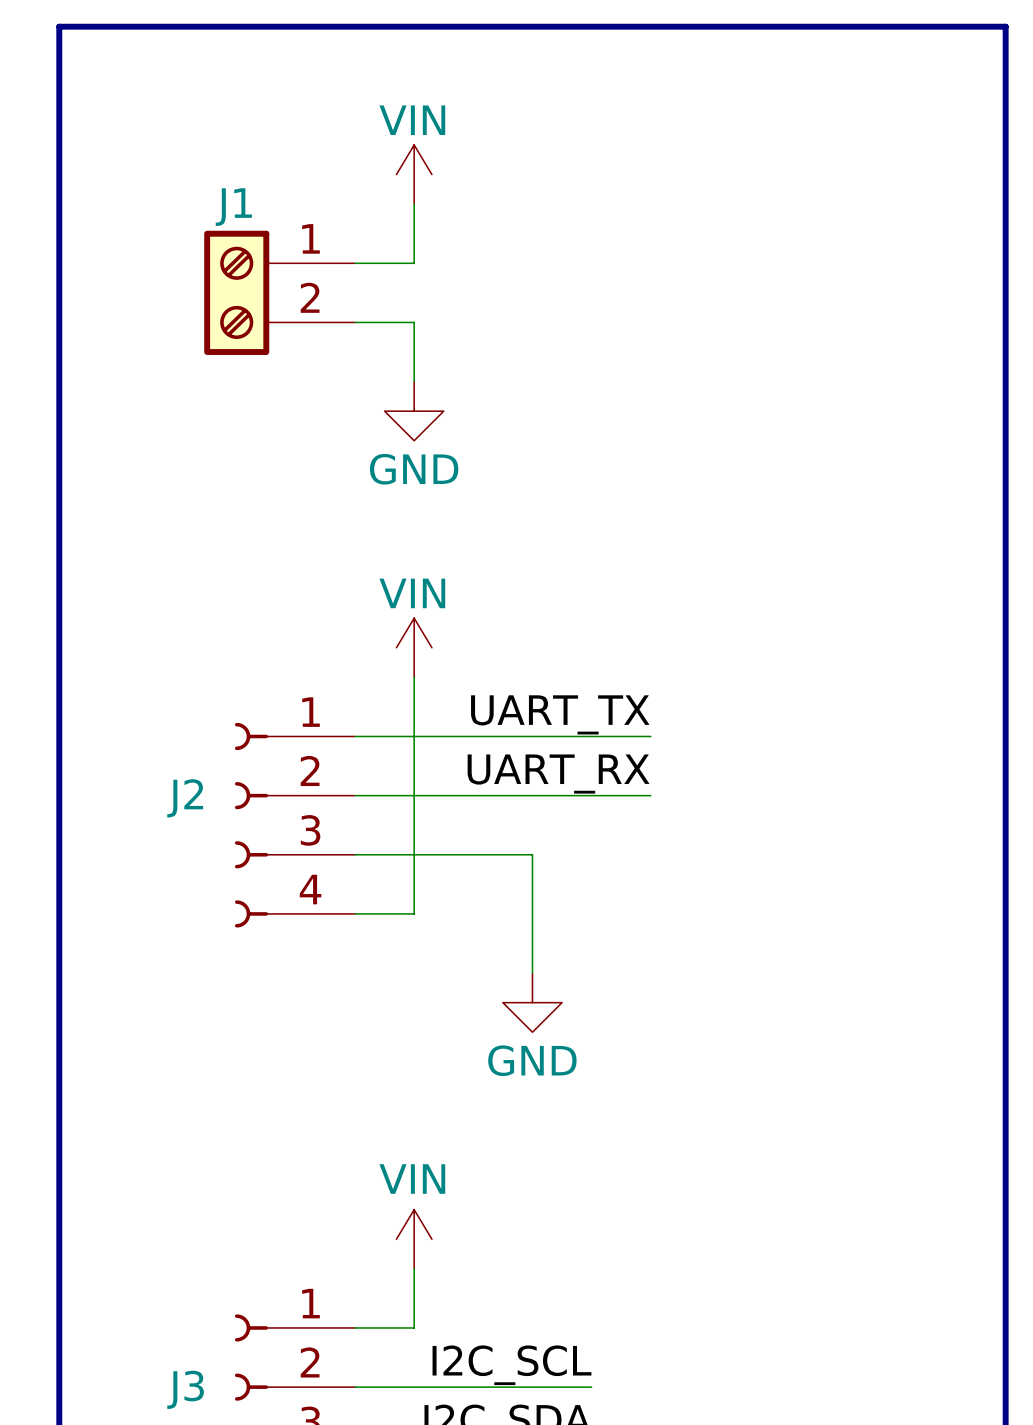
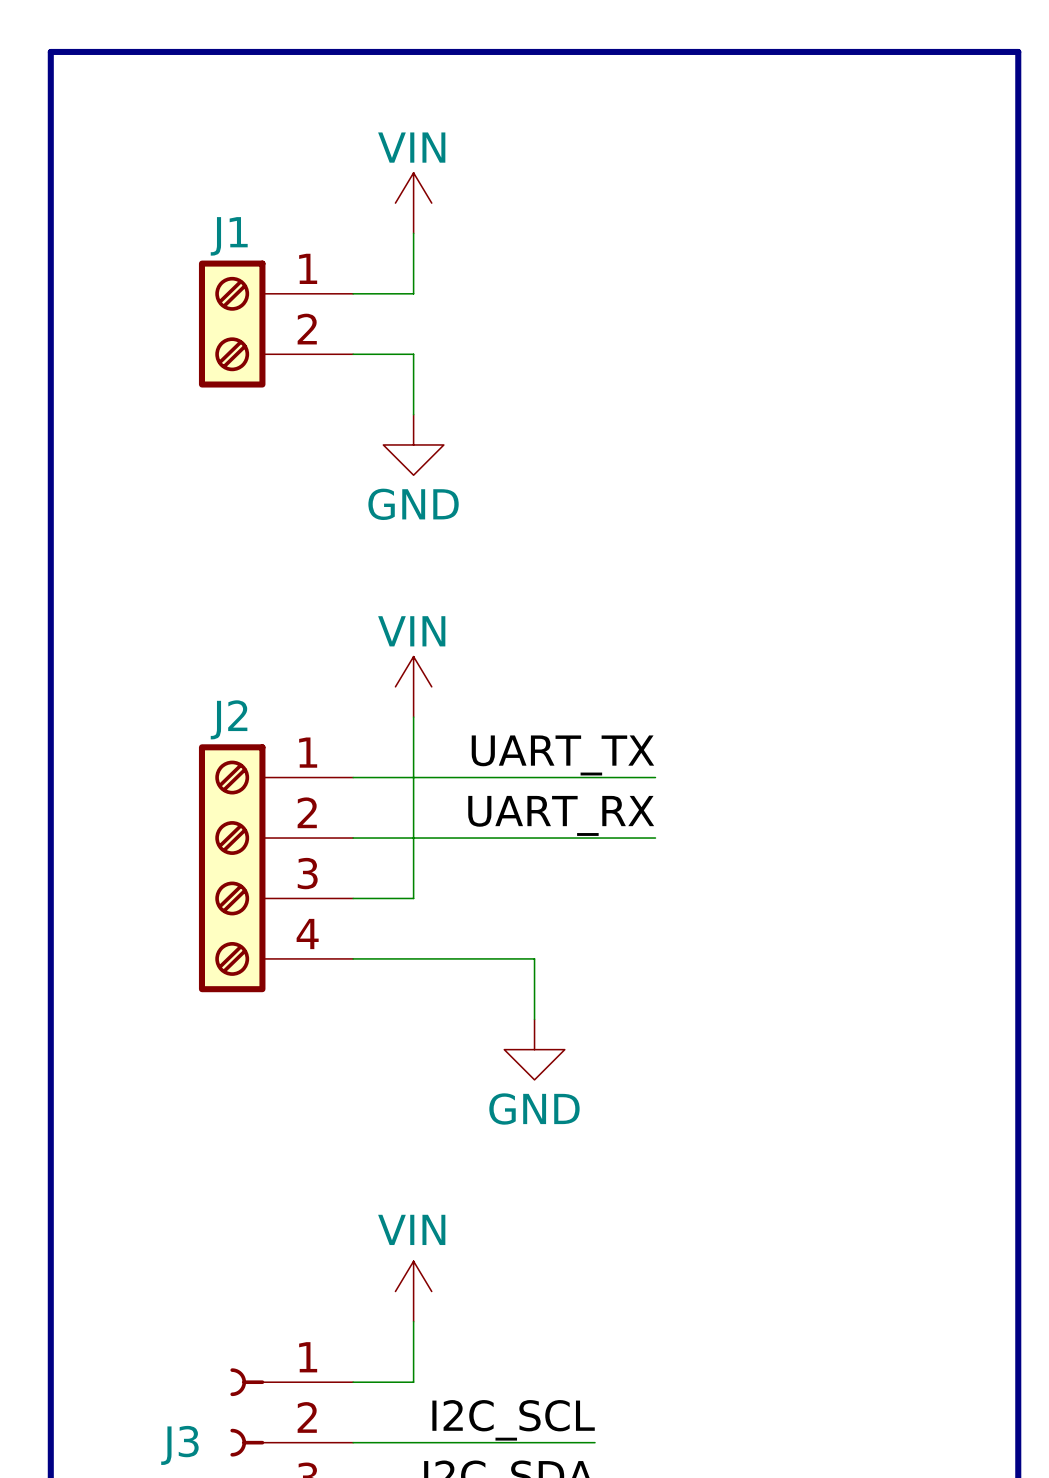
J2 symbol: [234, 722, 356, 928] -> [198, 744, 354, 993]
J2 name position: J2 (185, 798) -> J2 (229, 719)
wire: (414, 913) (414, 854) (532, 854) (532, 913) -> (413, 958) (534, 958)

